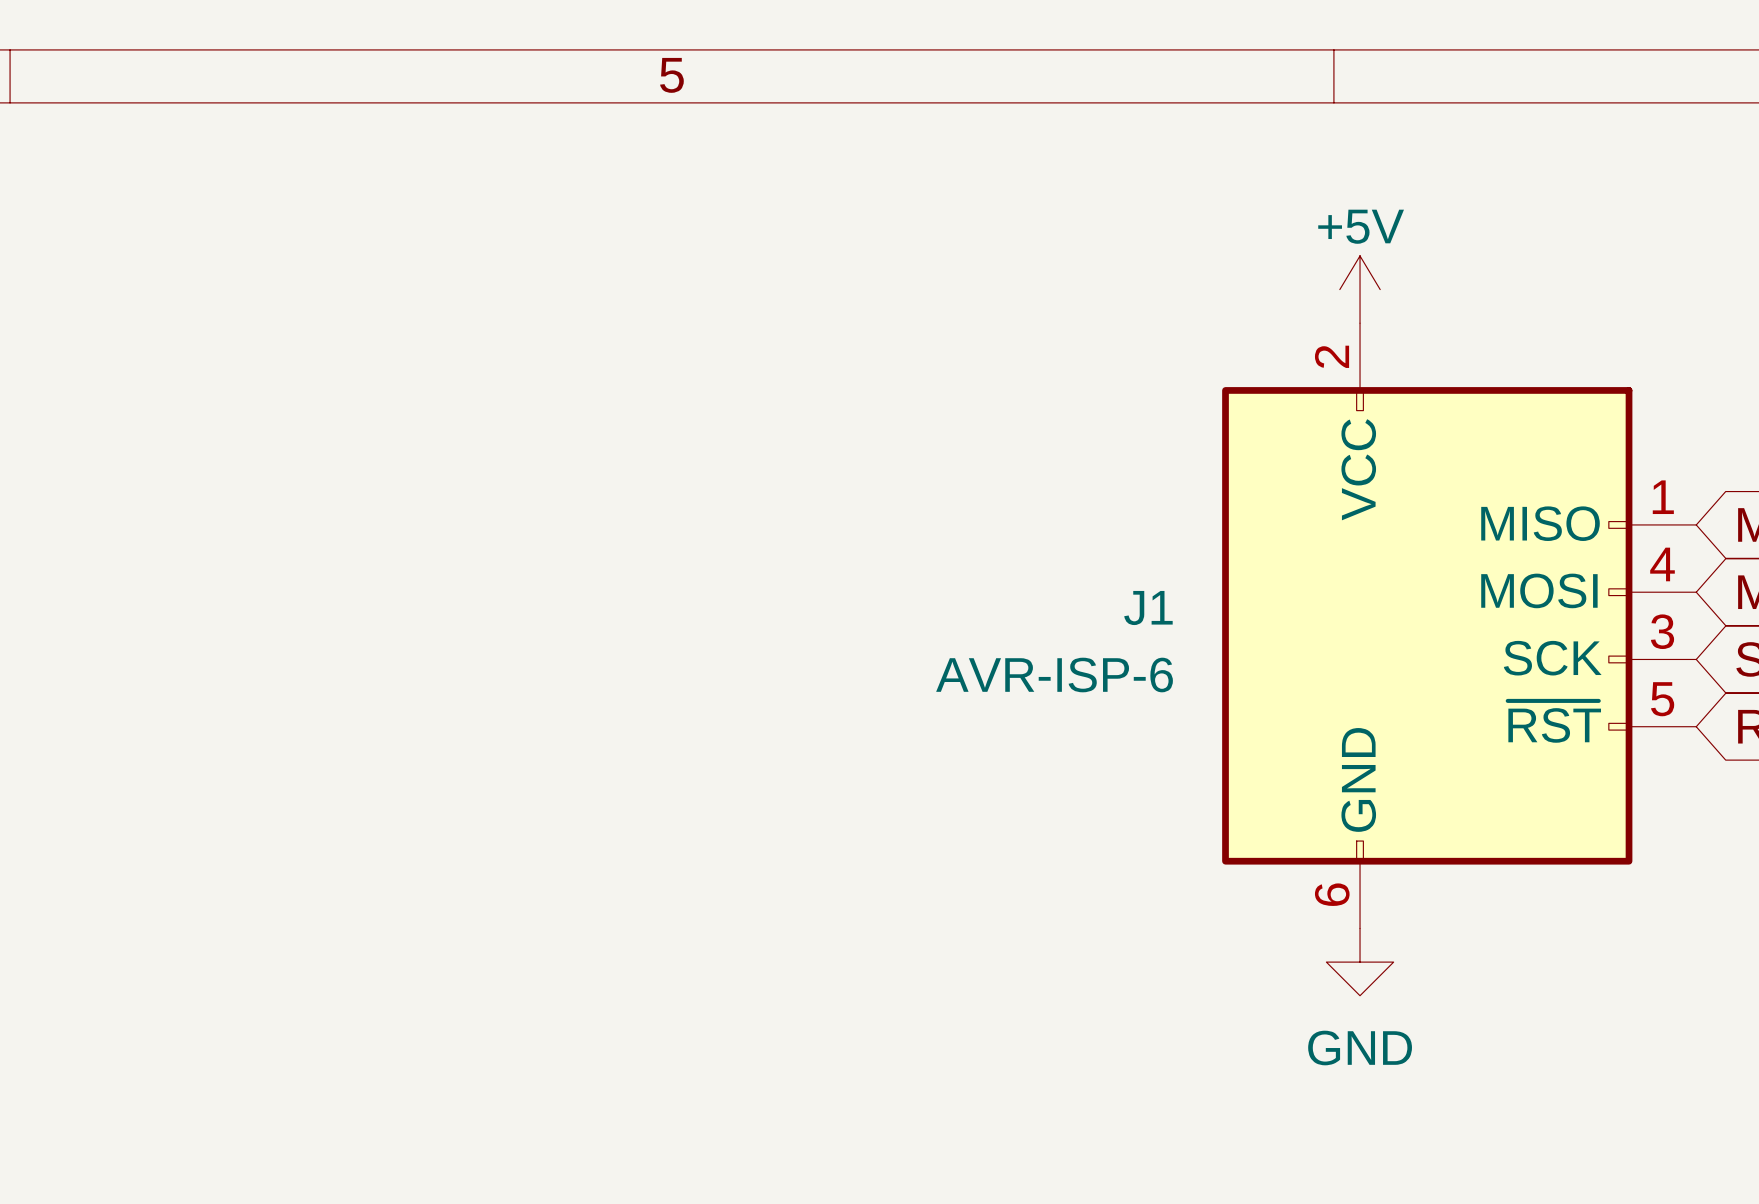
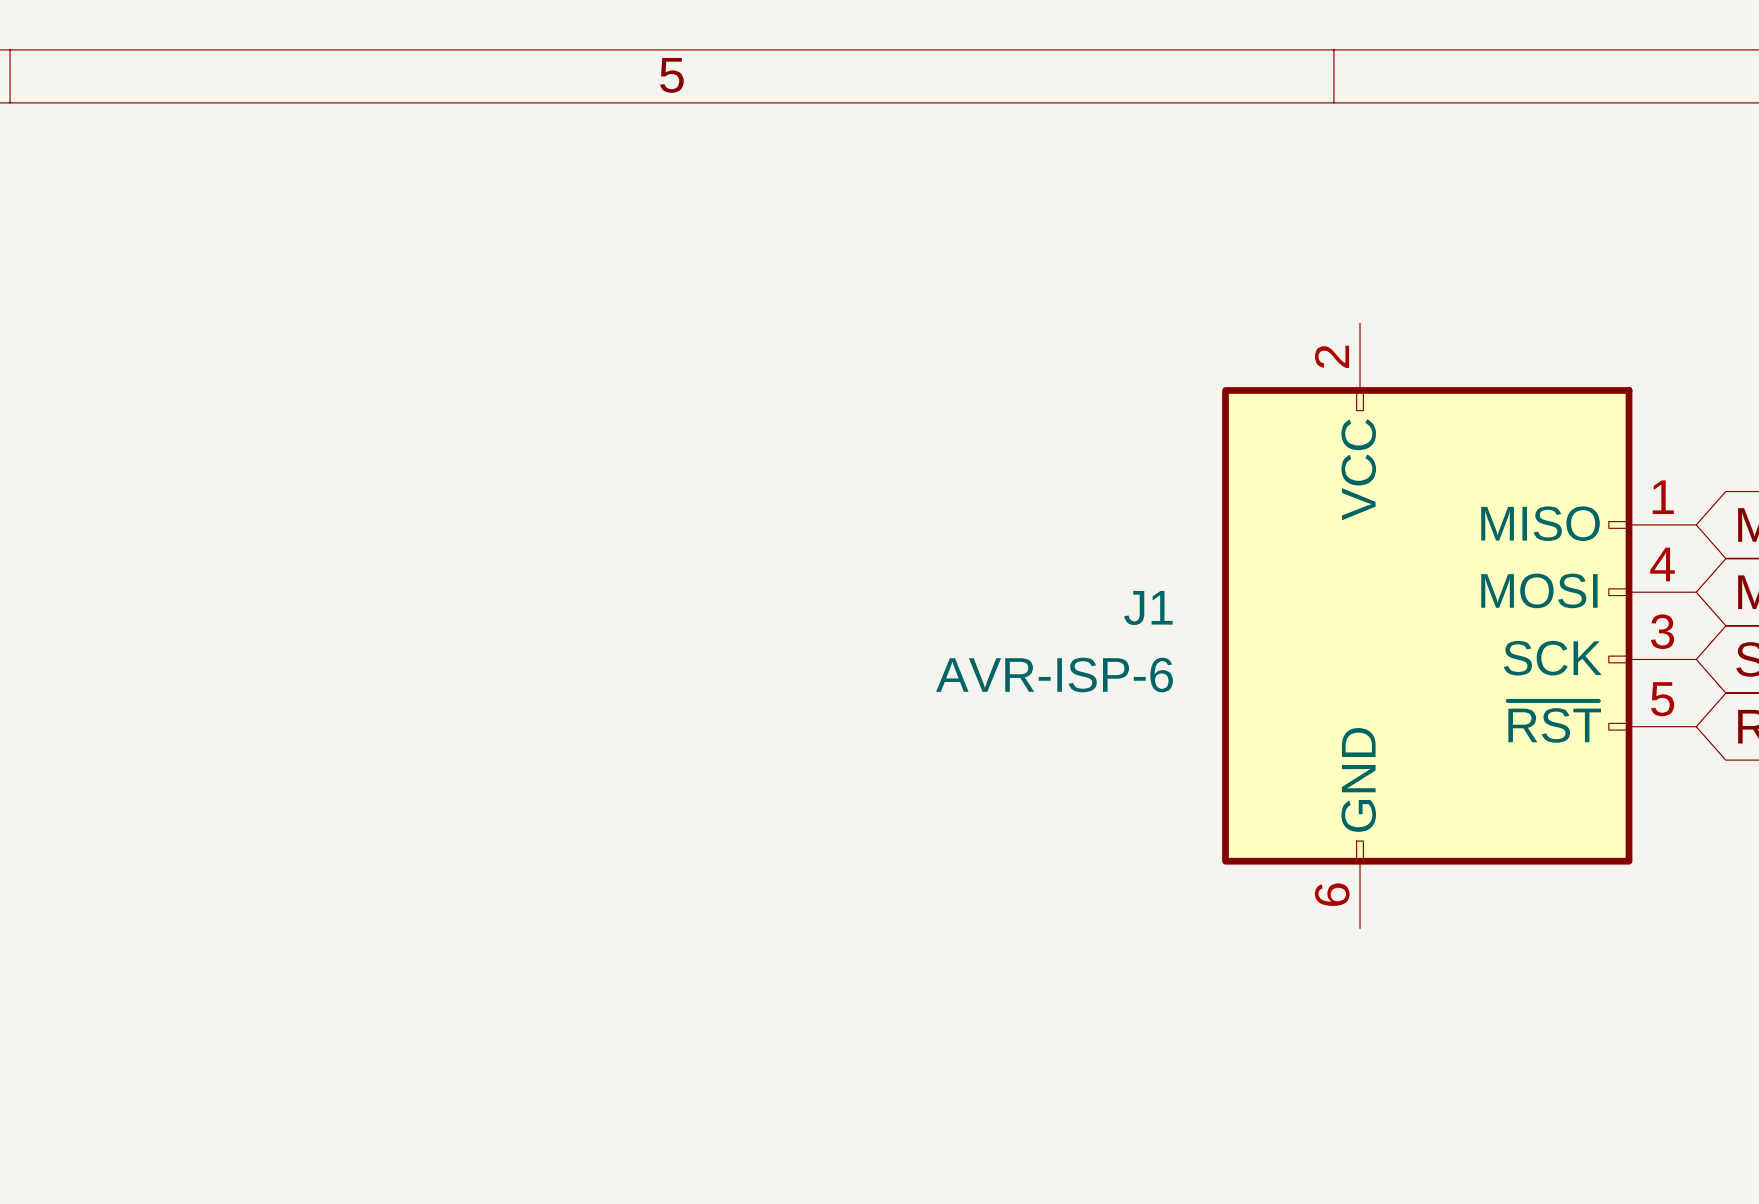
power symbol: +5V (1360, 289) -> none
power symbol: GND (1360, 962) -> none

